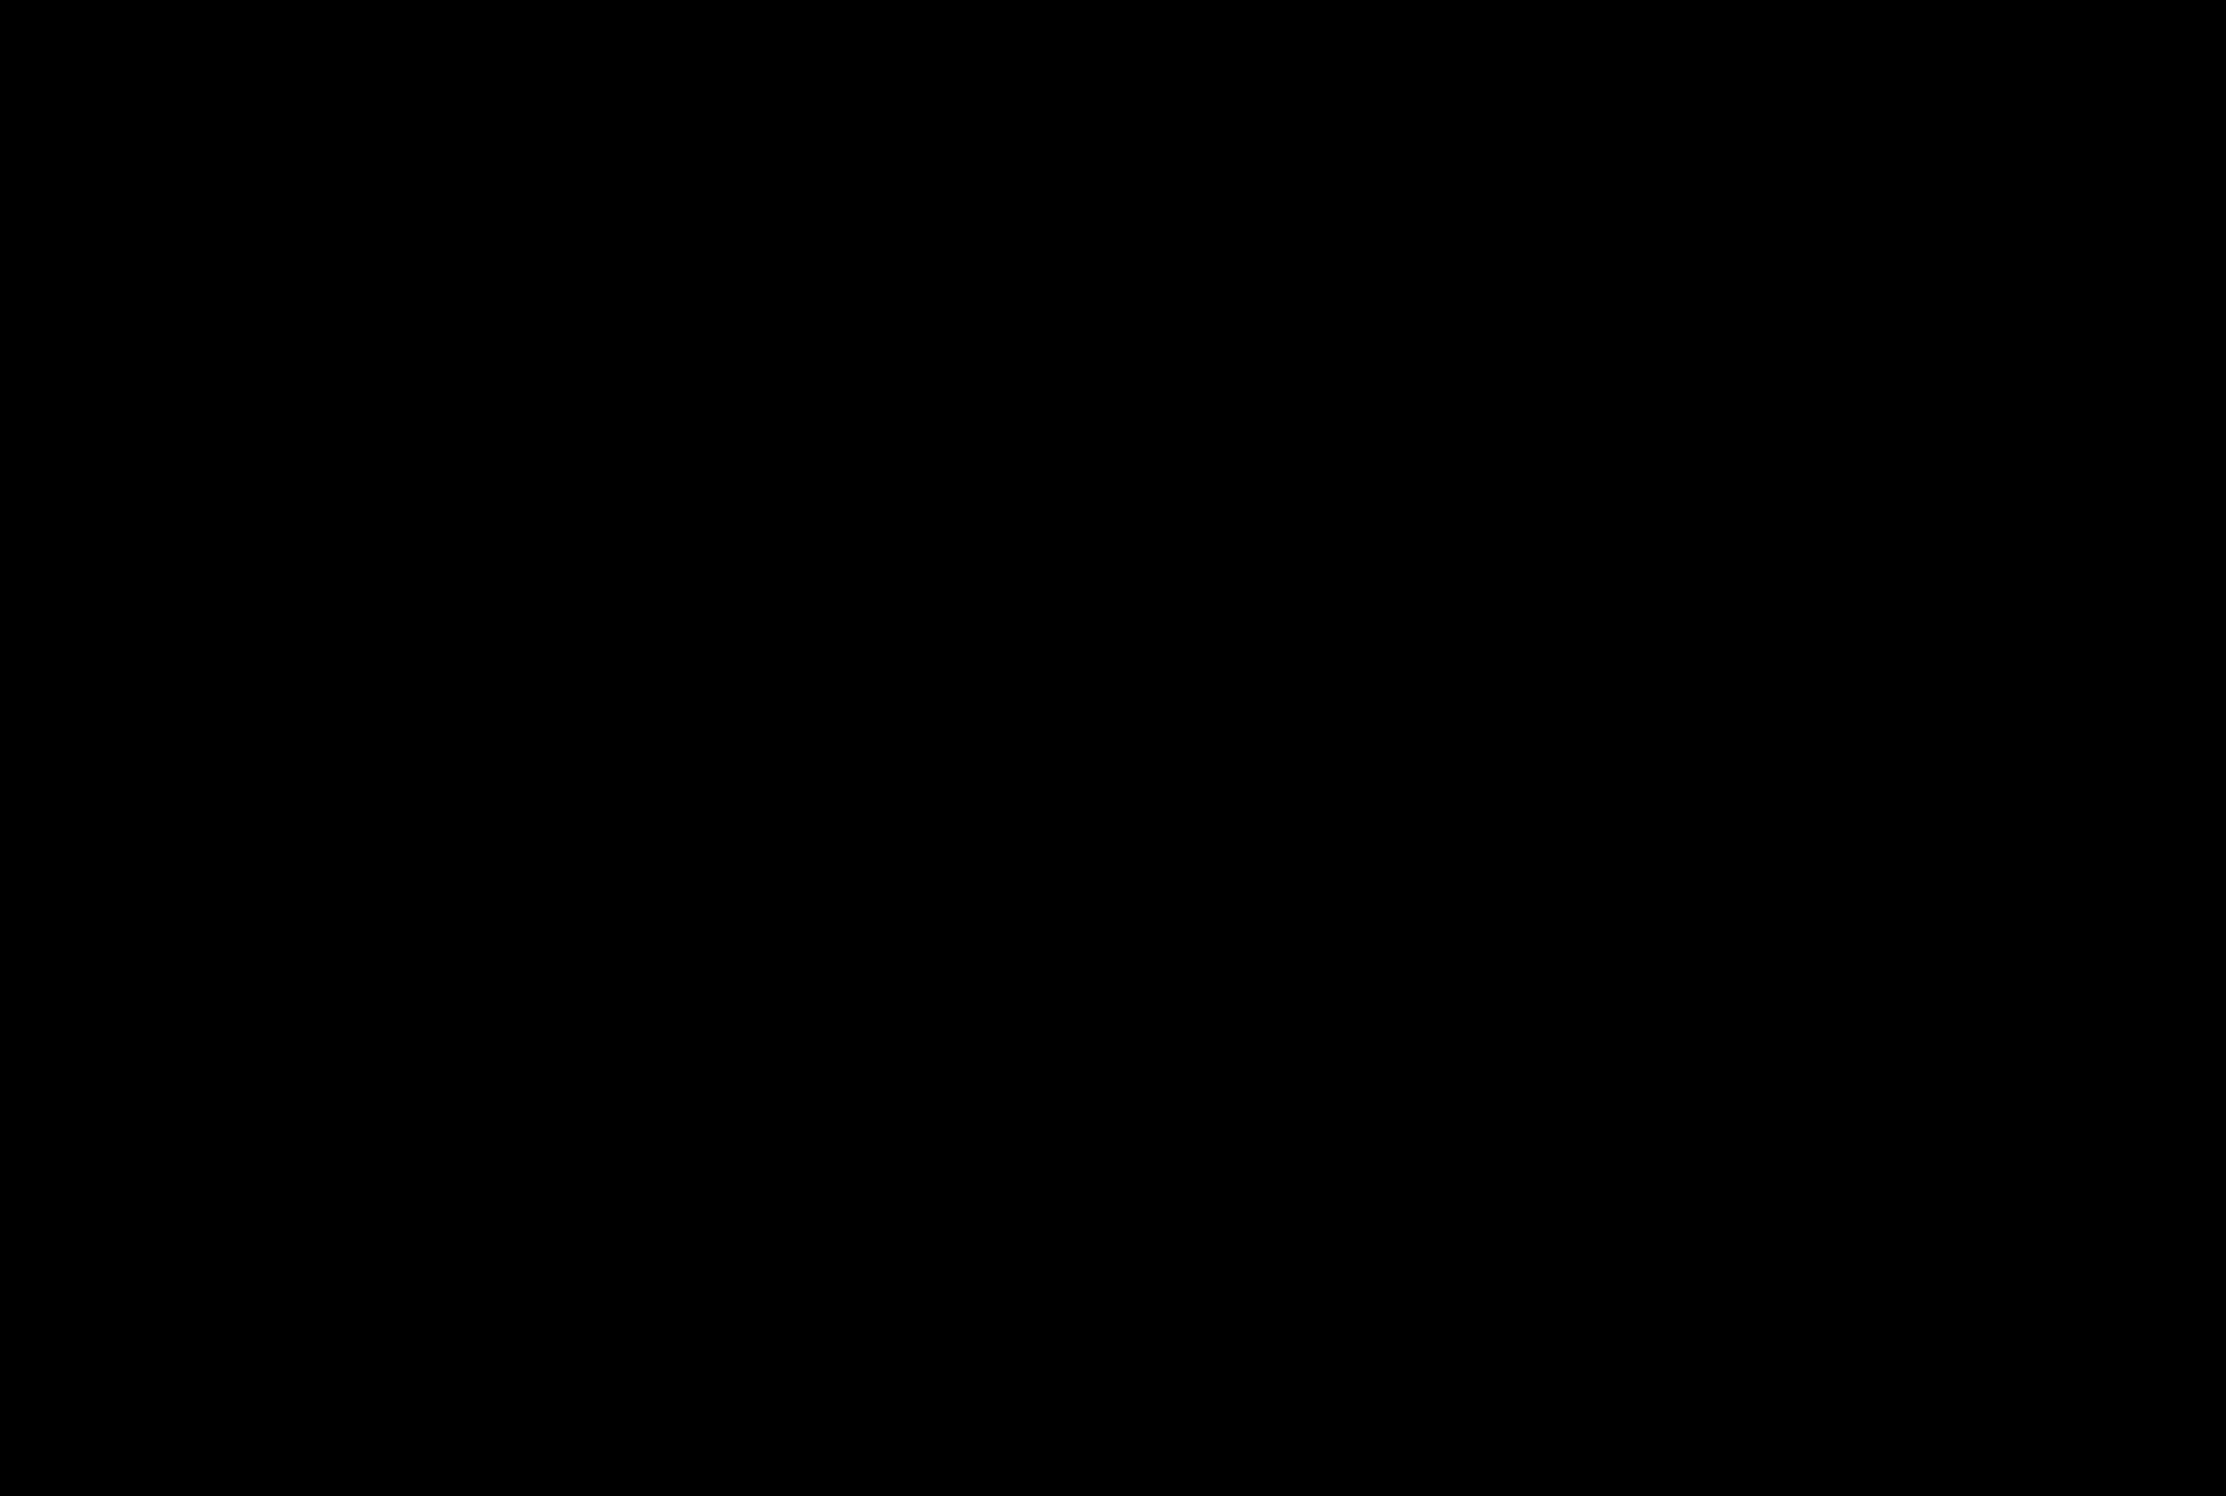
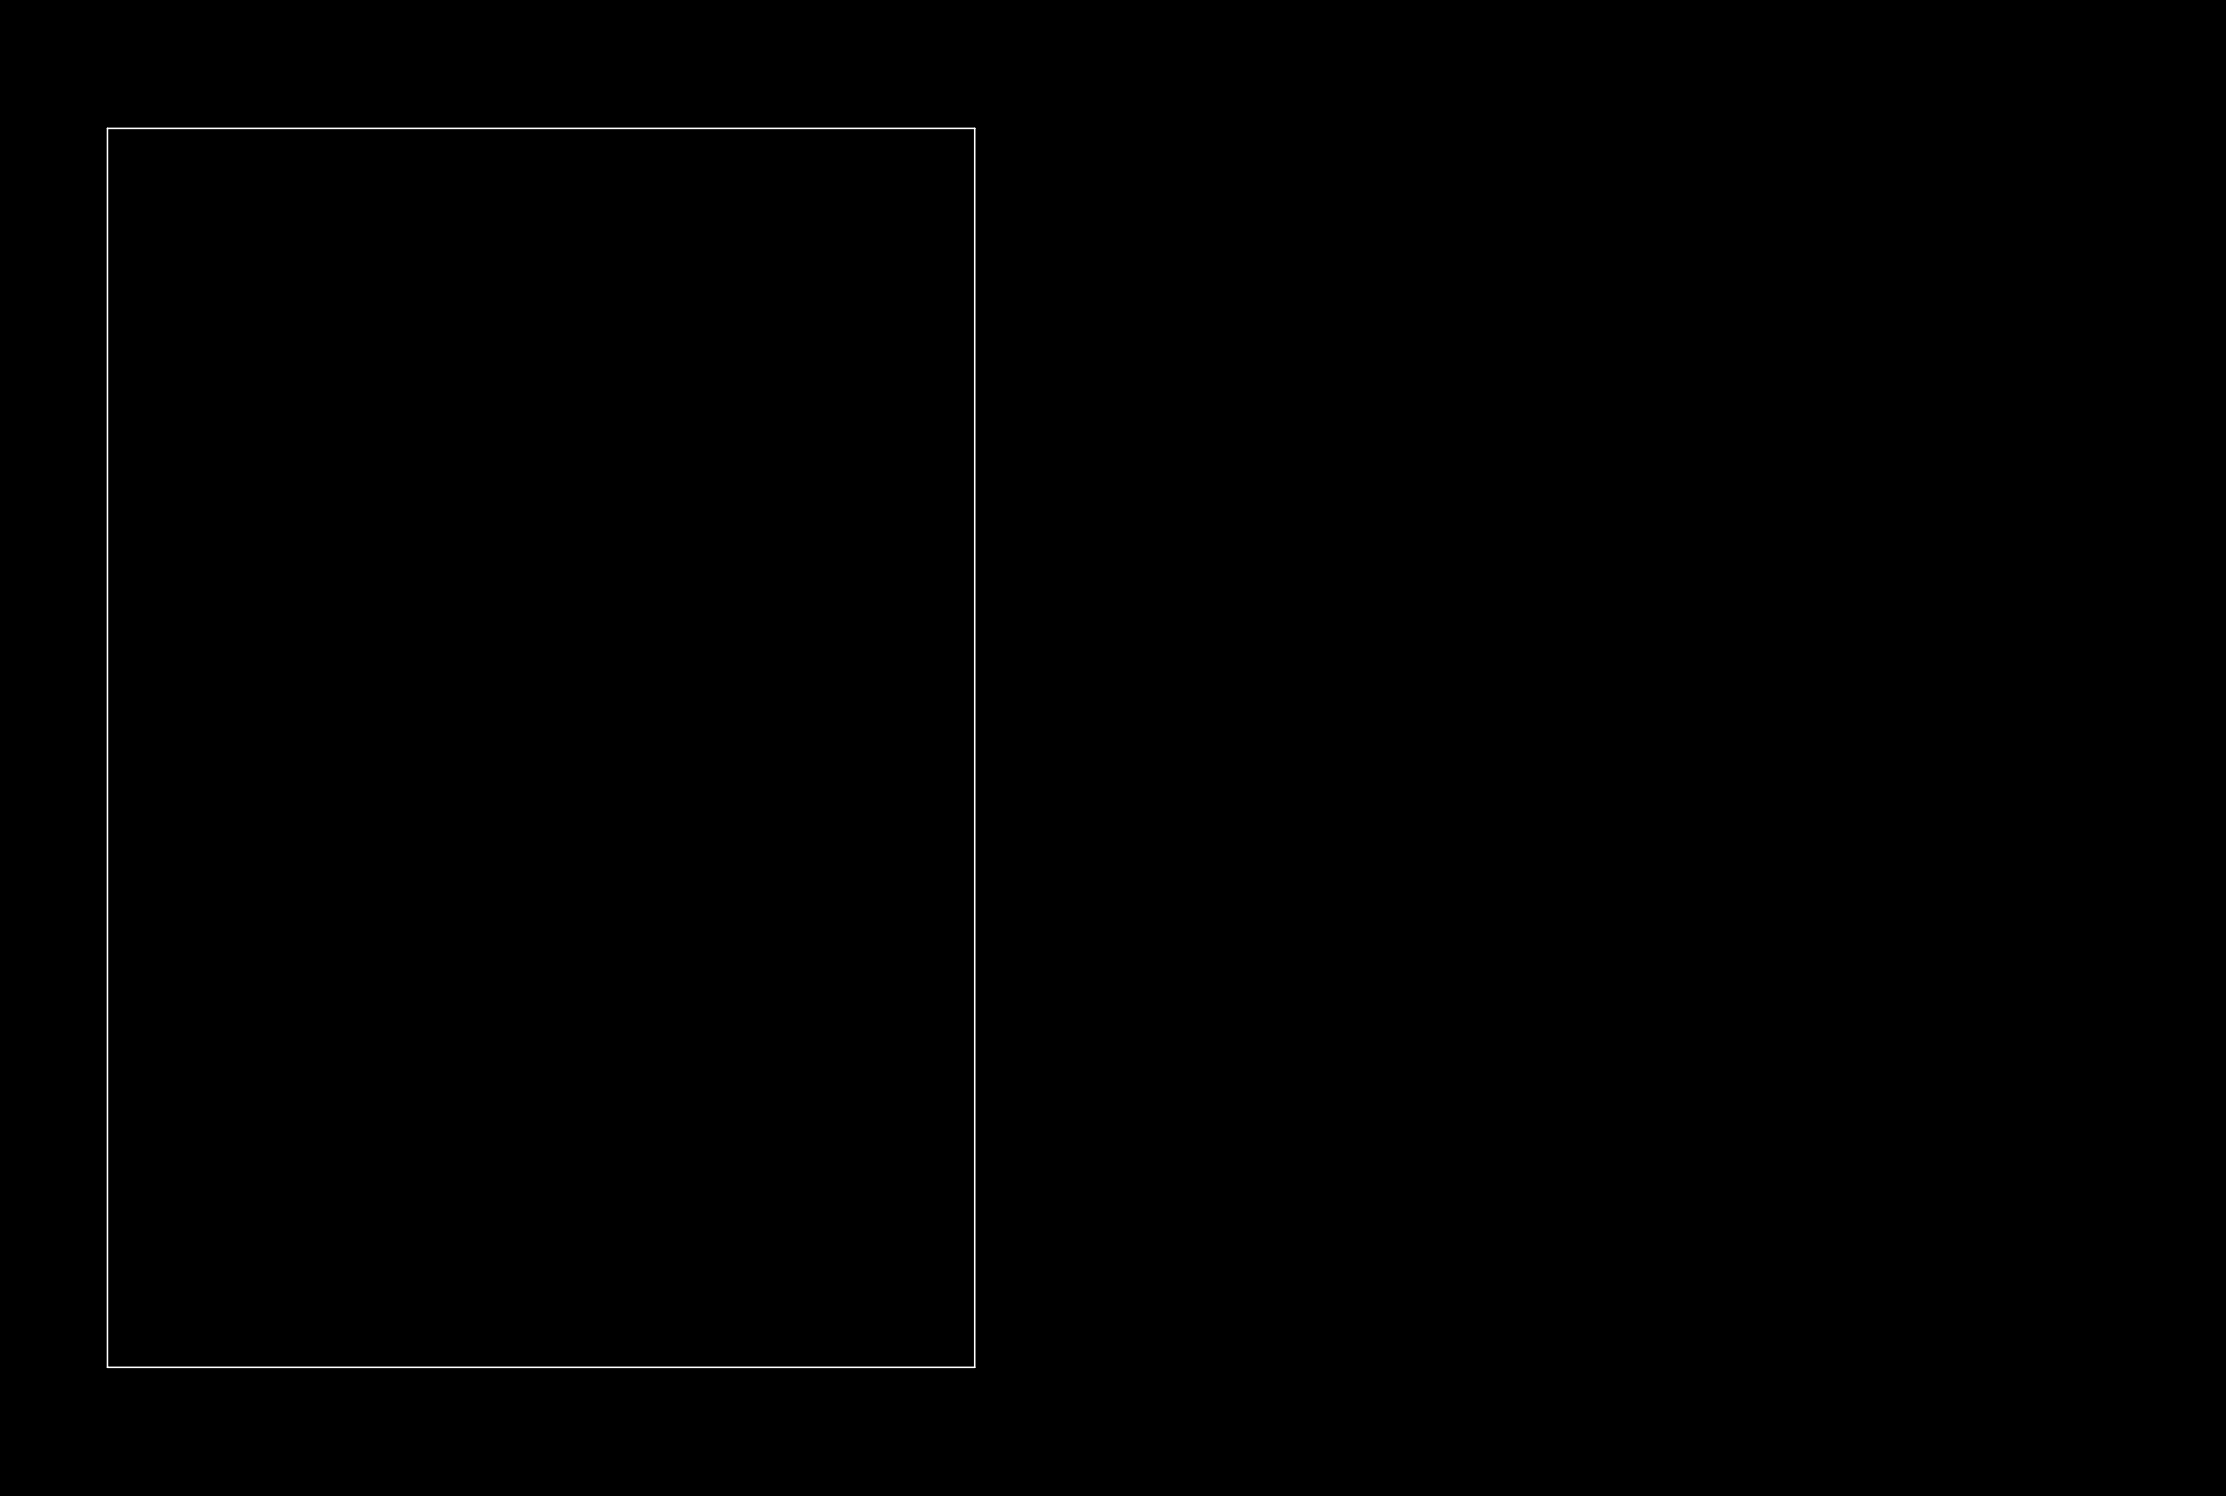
board edge: none -> (107, 128) (974, 128) (974, 1367) (107, 1367) (107, 128)

